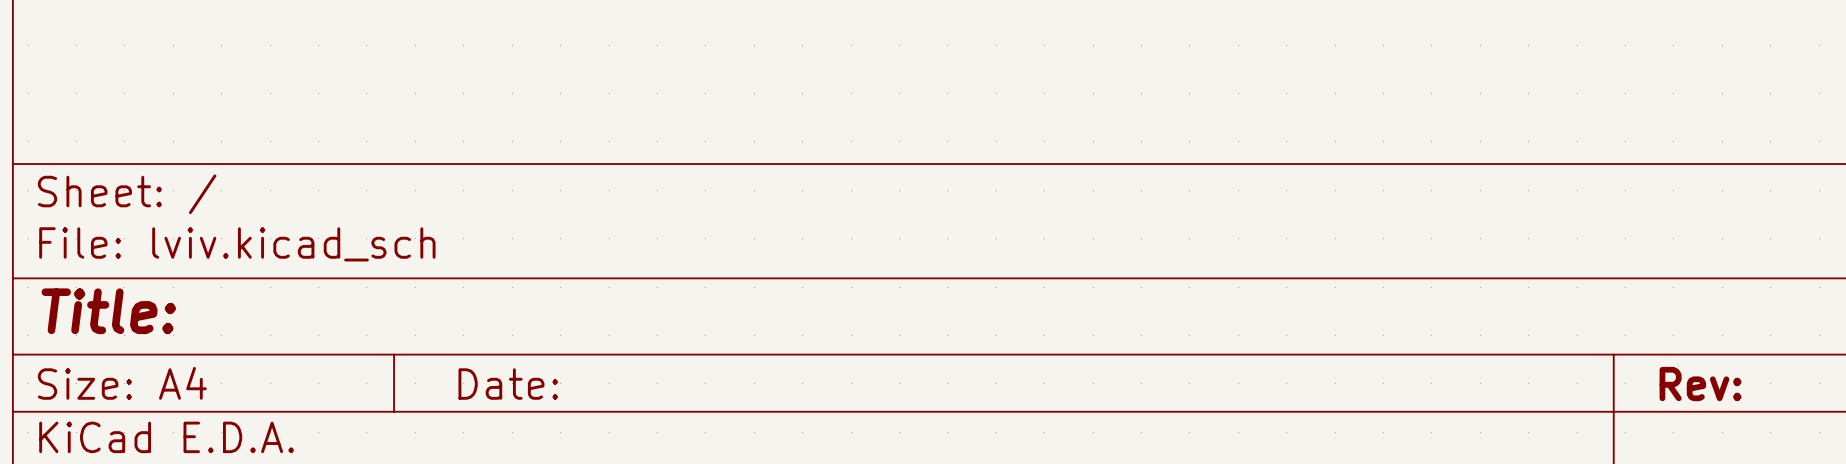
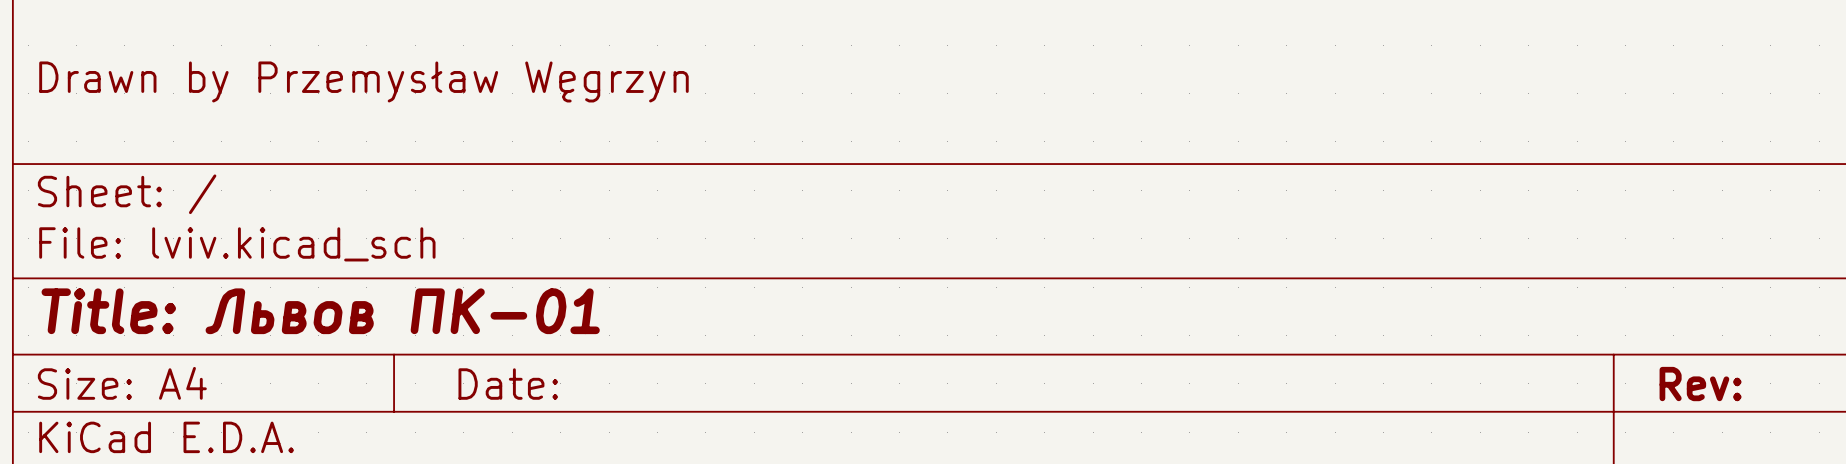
title block: none -> Drawn by Przemysław Węgrzyn (363, 81)
title block: Title: (108, 311) -> Title: Львов ПК-01 (320, 311)

